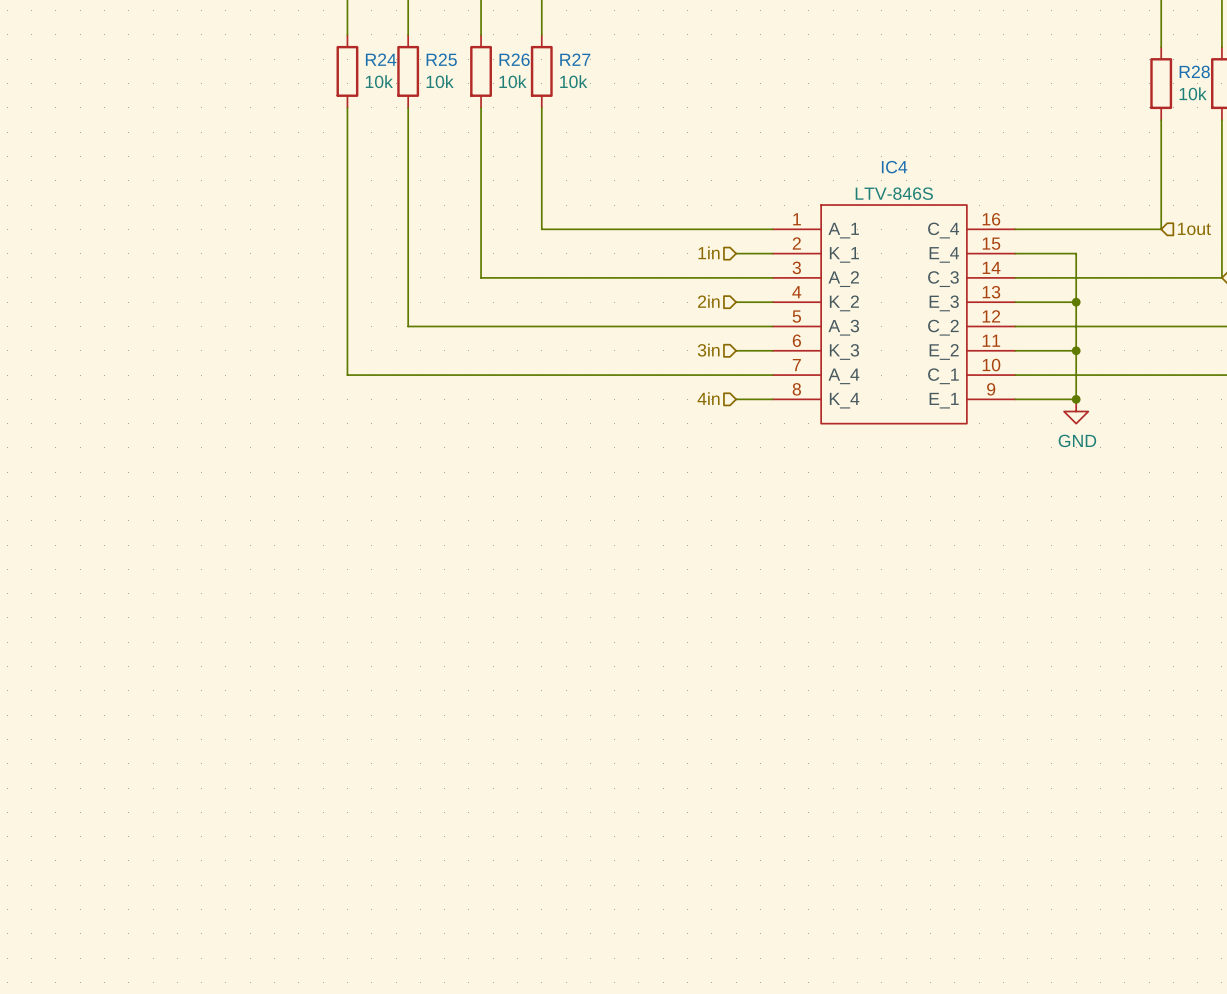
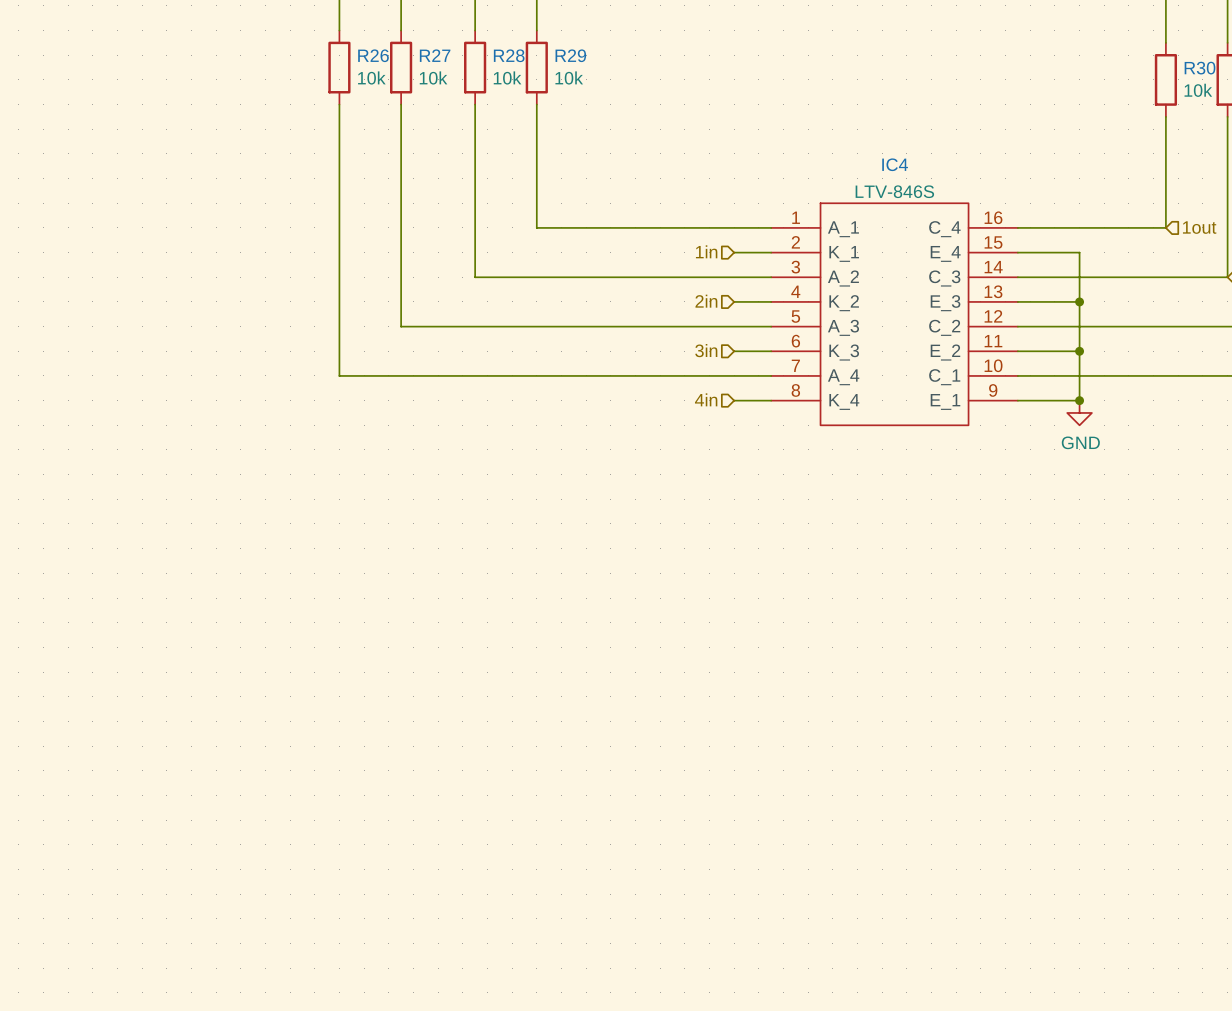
R24 name: R24 (381, 59) -> R26 (373, 55)
R25 name: R25 (441, 59) -> R27 (435, 55)
R26 name: R26 (514, 59) -> R28 (509, 55)
R27 name: R27 (575, 59) -> R29 (570, 55)
R28 name: R28 (1194, 71) -> R30 (1200, 68)

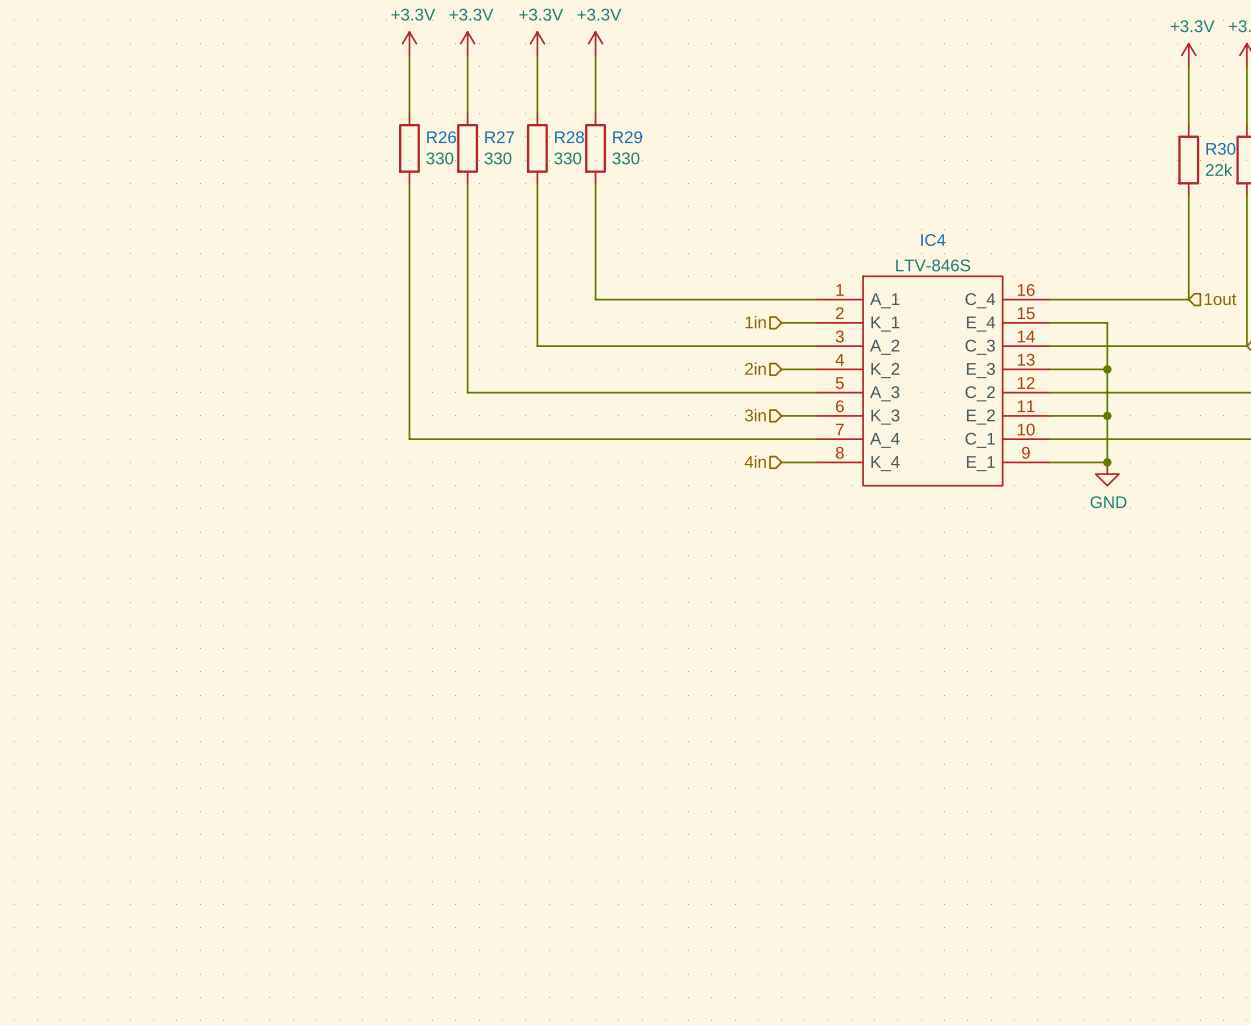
R26 value: 10k (371, 77) -> 330 (439, 158)
R27 value: 10k (433, 77) -> 330 (497, 158)
R28 value: 10k (507, 77) -> 330 (567, 158)
R29 value: 10k (569, 77) -> 330 (625, 158)
R30 value: 10k (1198, 90) -> 22k (1219, 169)

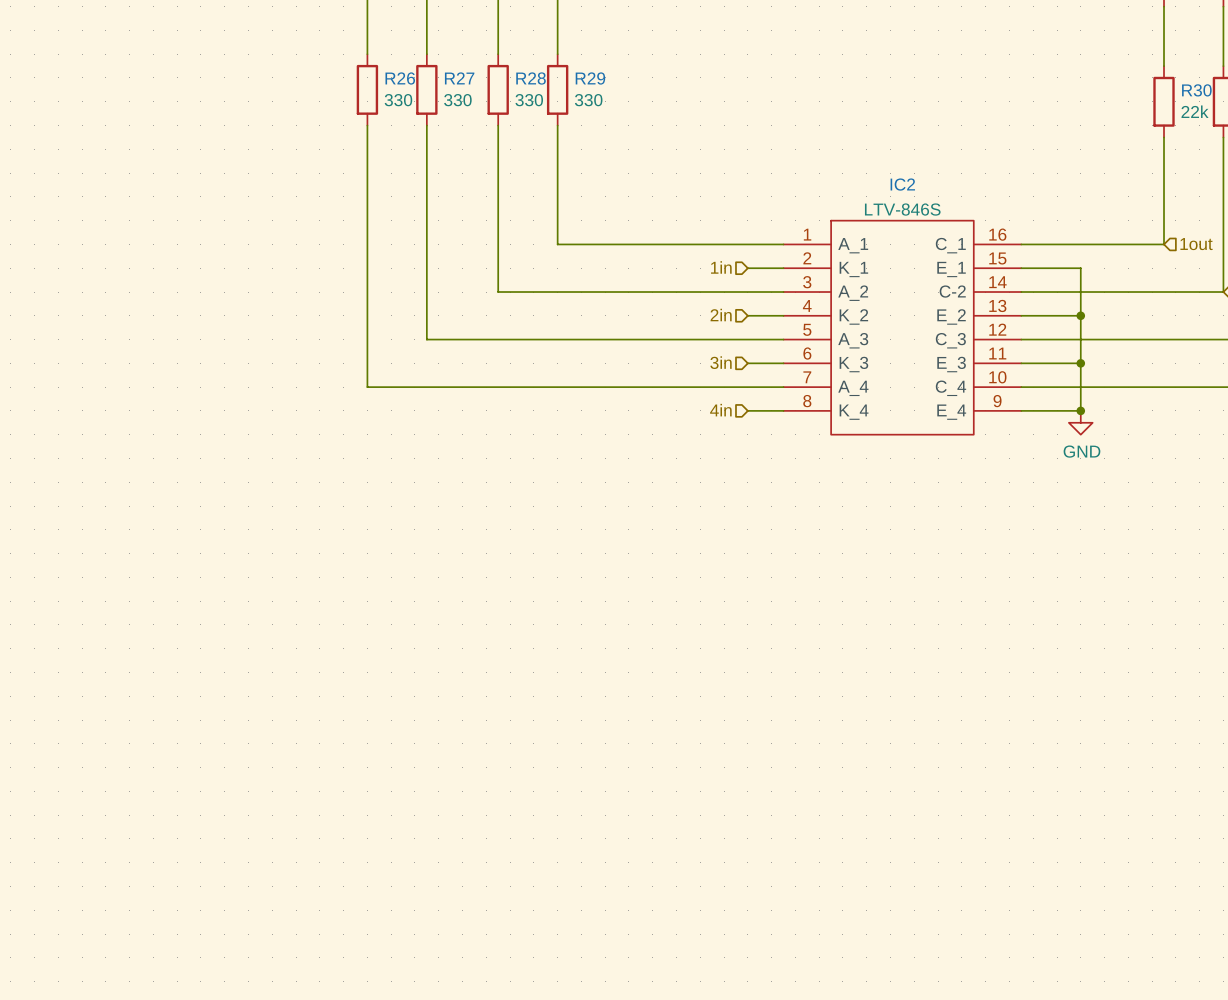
IC4 name: IC4 (933, 240) -> IC2 (902, 184)
IC4 pin name: C_4 (980, 300) -> C_1 (950, 245)
IC4 pin name: E_4 (981, 324) -> E_1 (951, 269)
IC4 pin name: C_3 (980, 347) -> C-2 (952, 291)
IC4 pin name: E_3 (980, 370) -> E_2 (951, 316)
IC4 pin name: C_2 (980, 393) -> C_3 (950, 340)
IC4 pin name: E_2 (980, 417) -> E_3 (951, 364)
IC4 pin name: C_1 (980, 440) -> C_4 (950, 388)
IC4 pin name: E_1 (980, 463) -> E_4 (951, 412)

